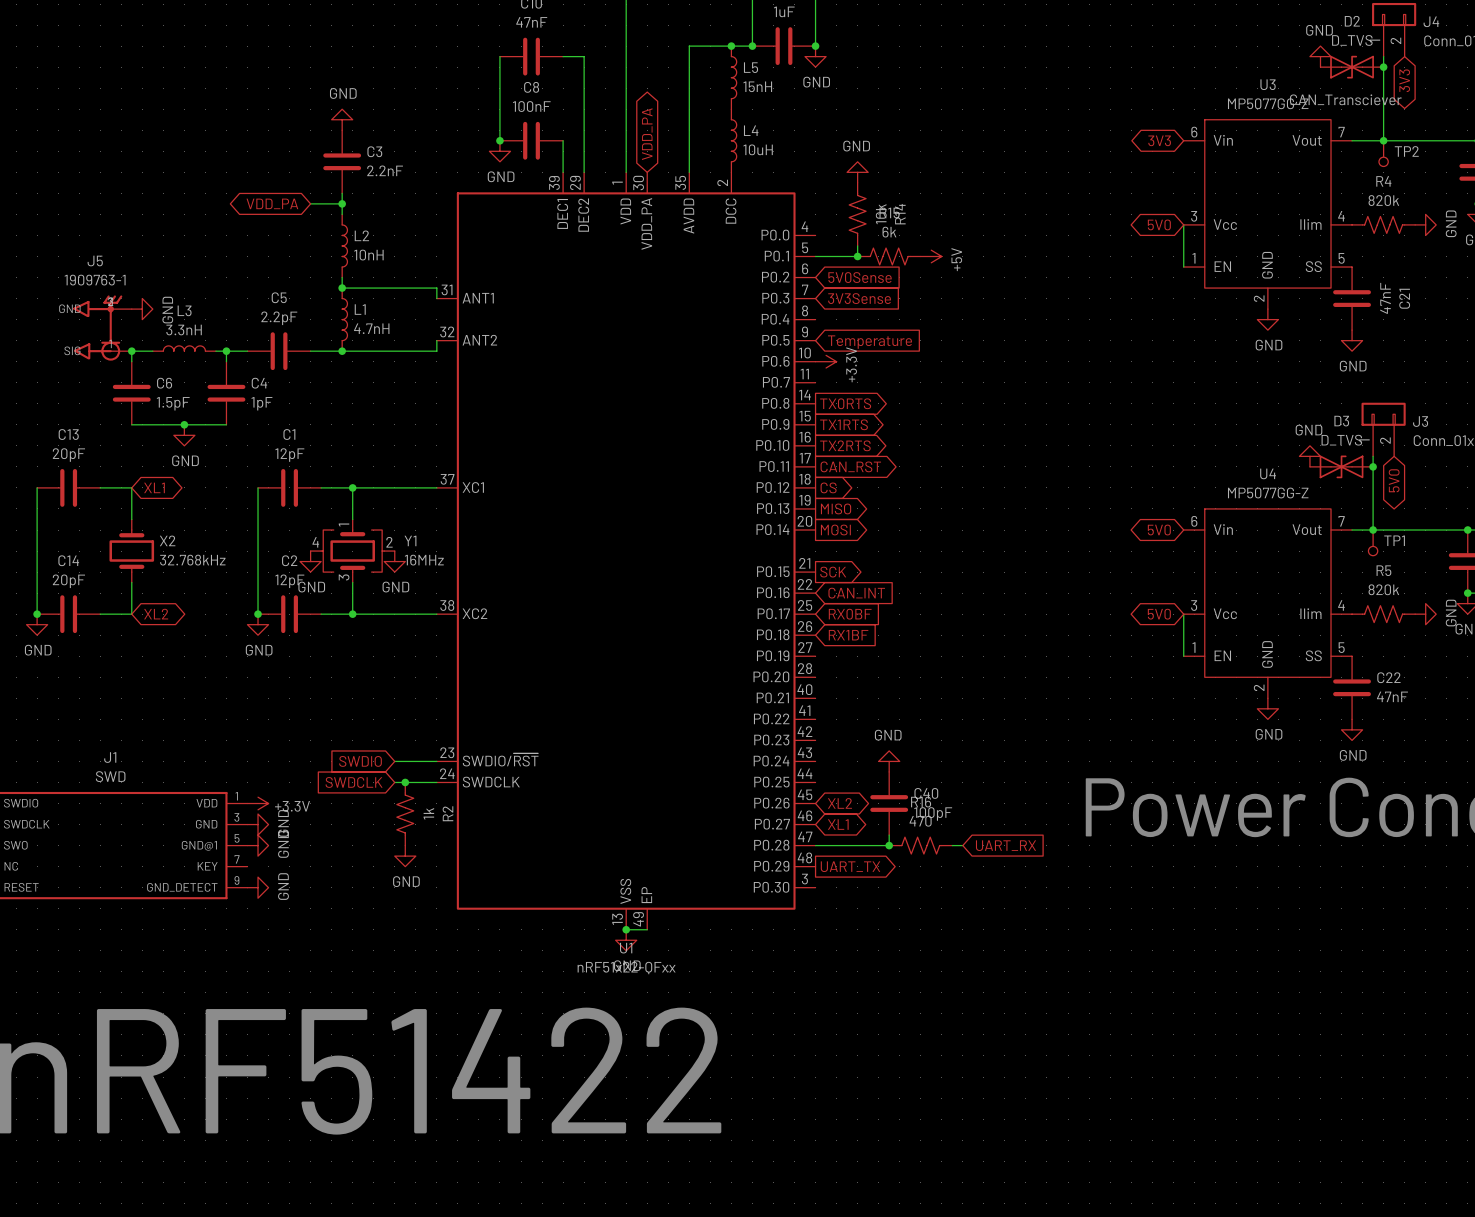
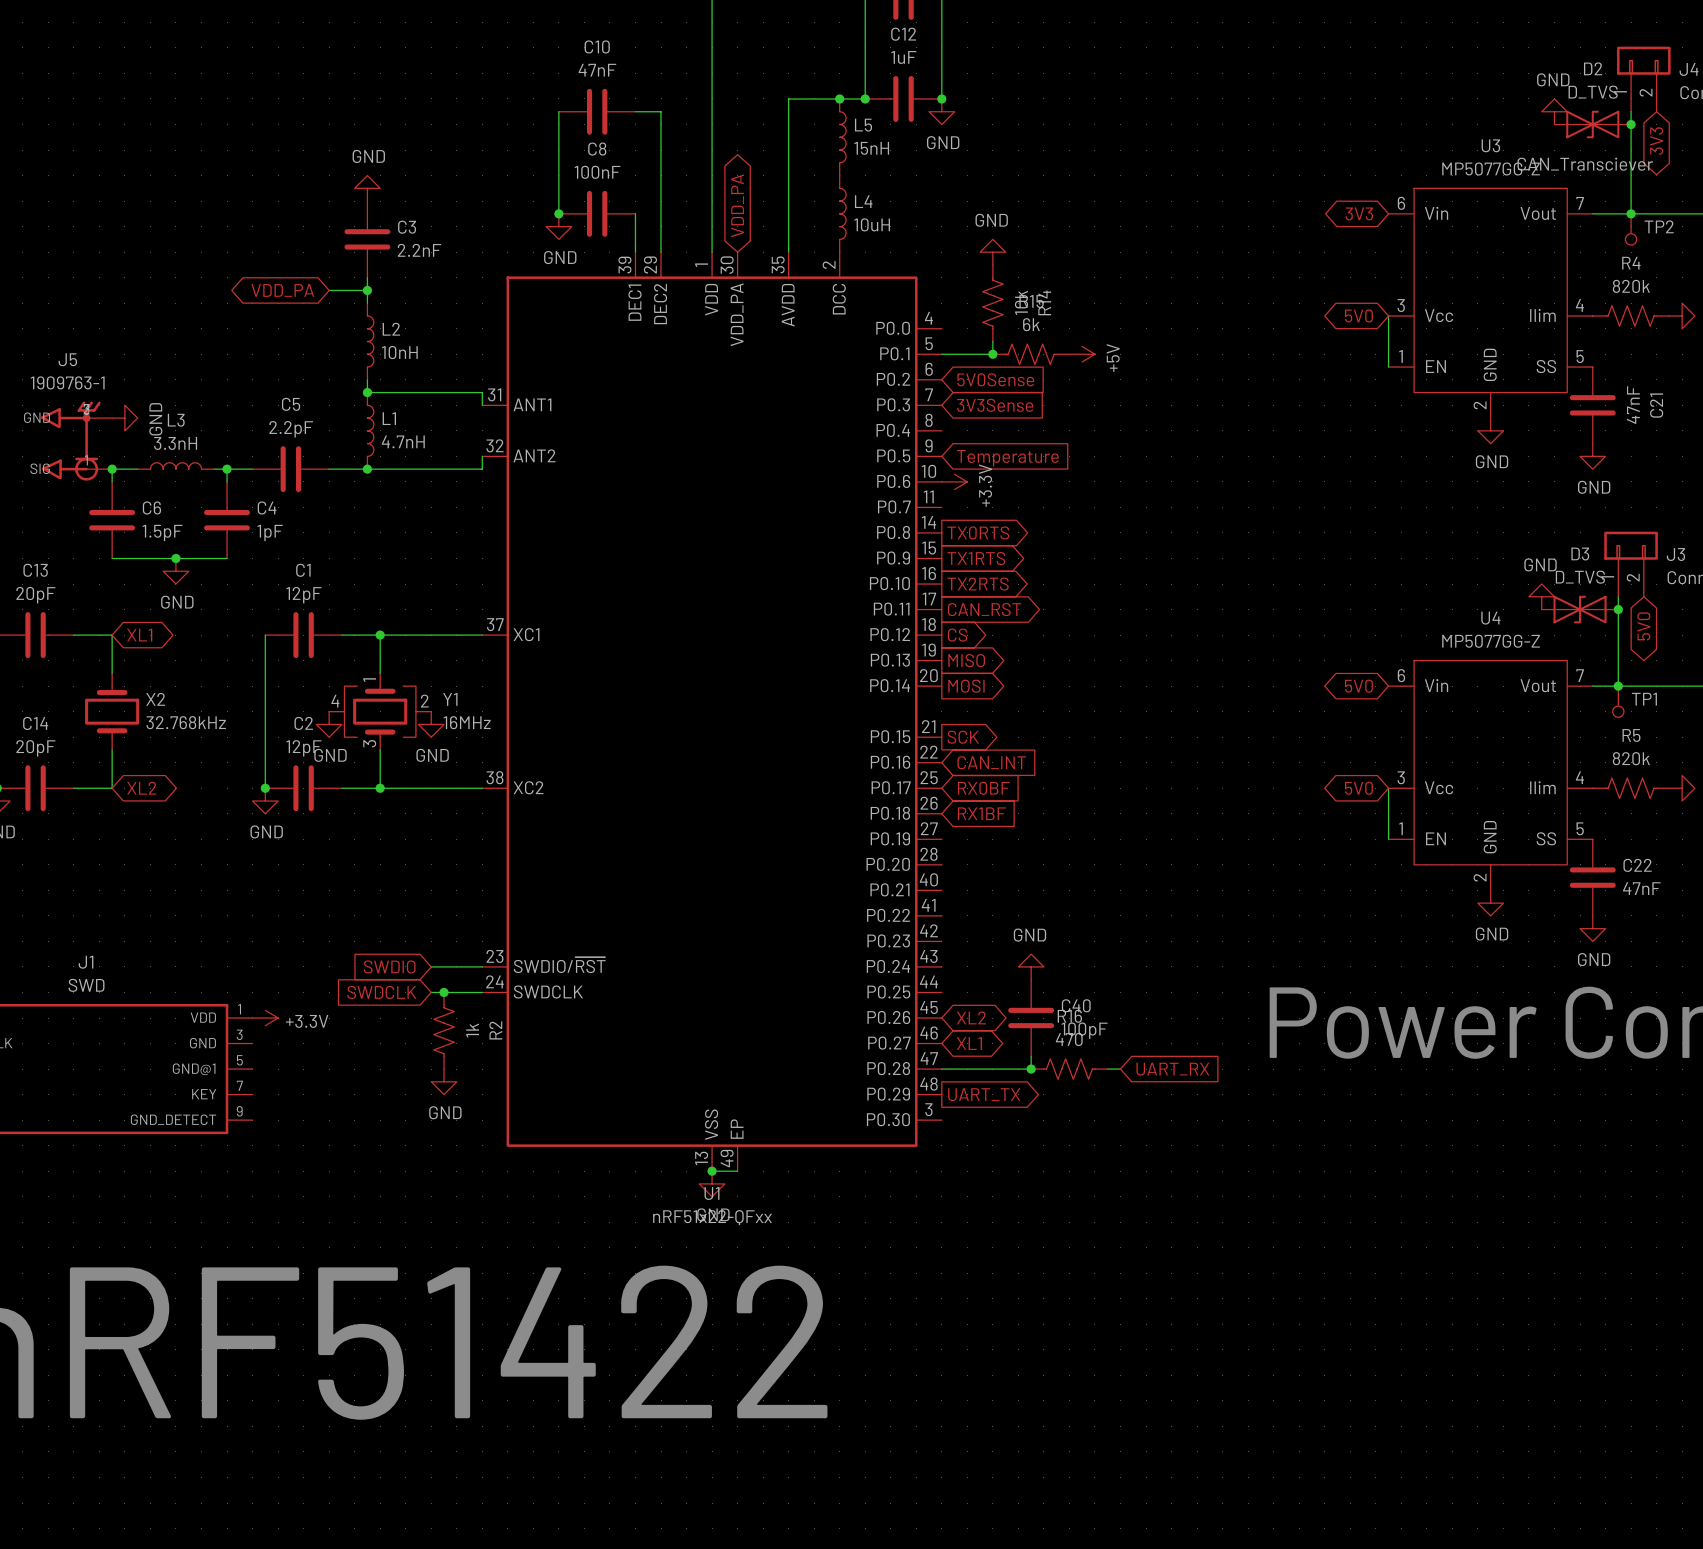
power symbol: GND (258, 824) -> none
power symbol: GND (258, 845) -> none
power symbol: GND (258, 887) -> none

